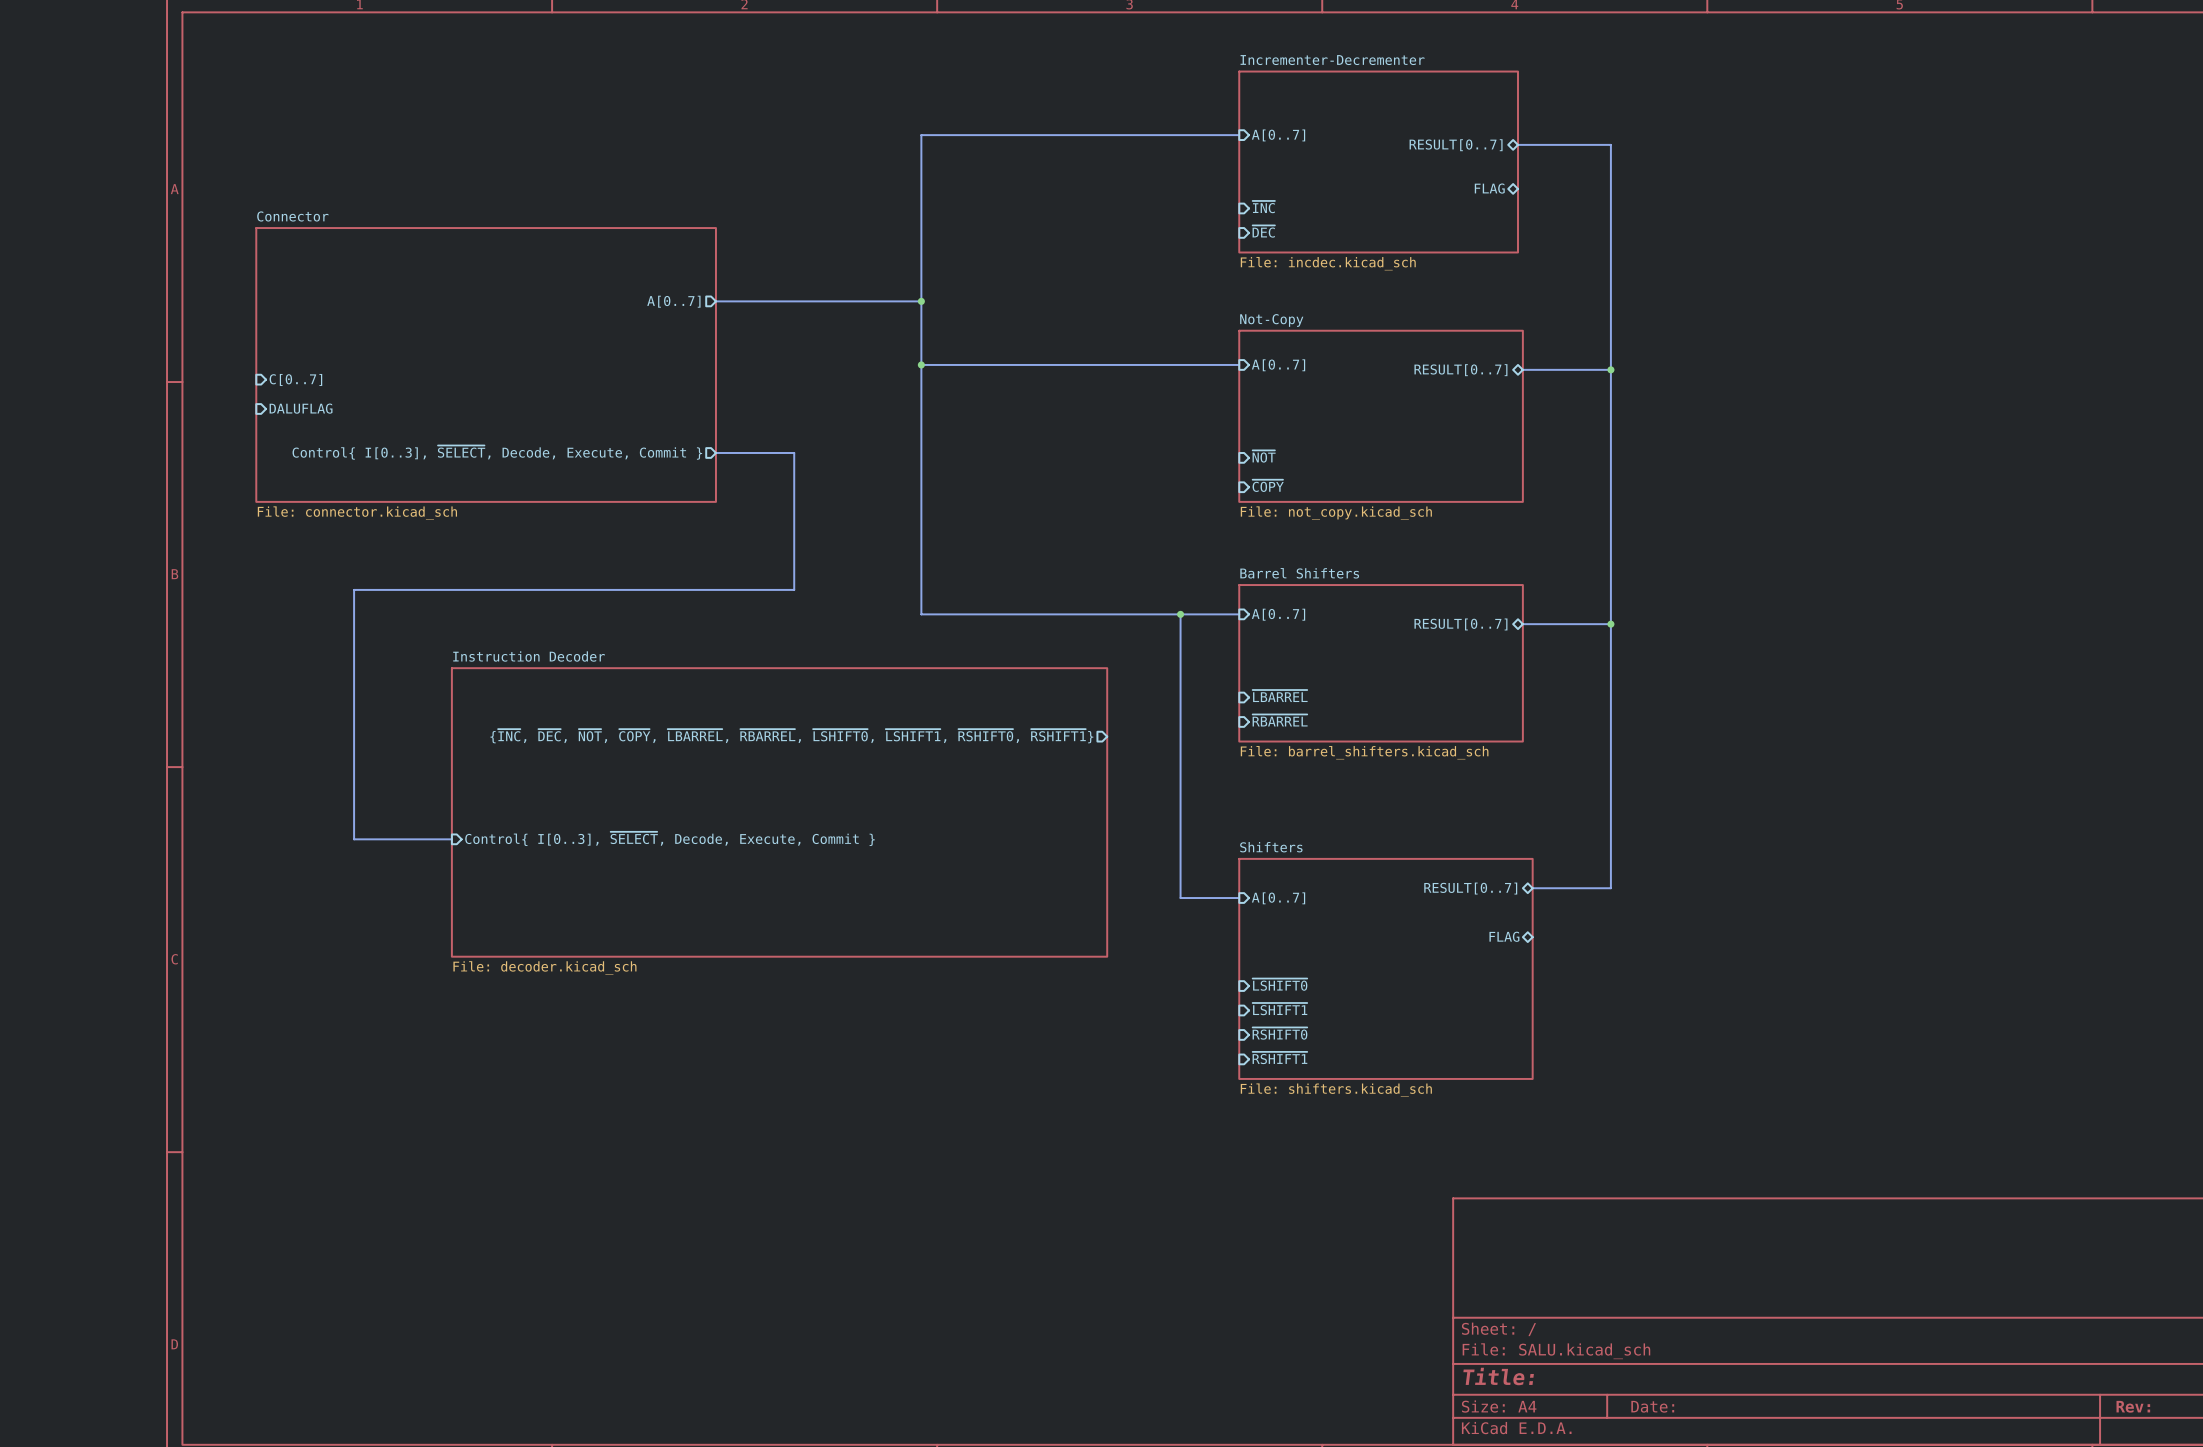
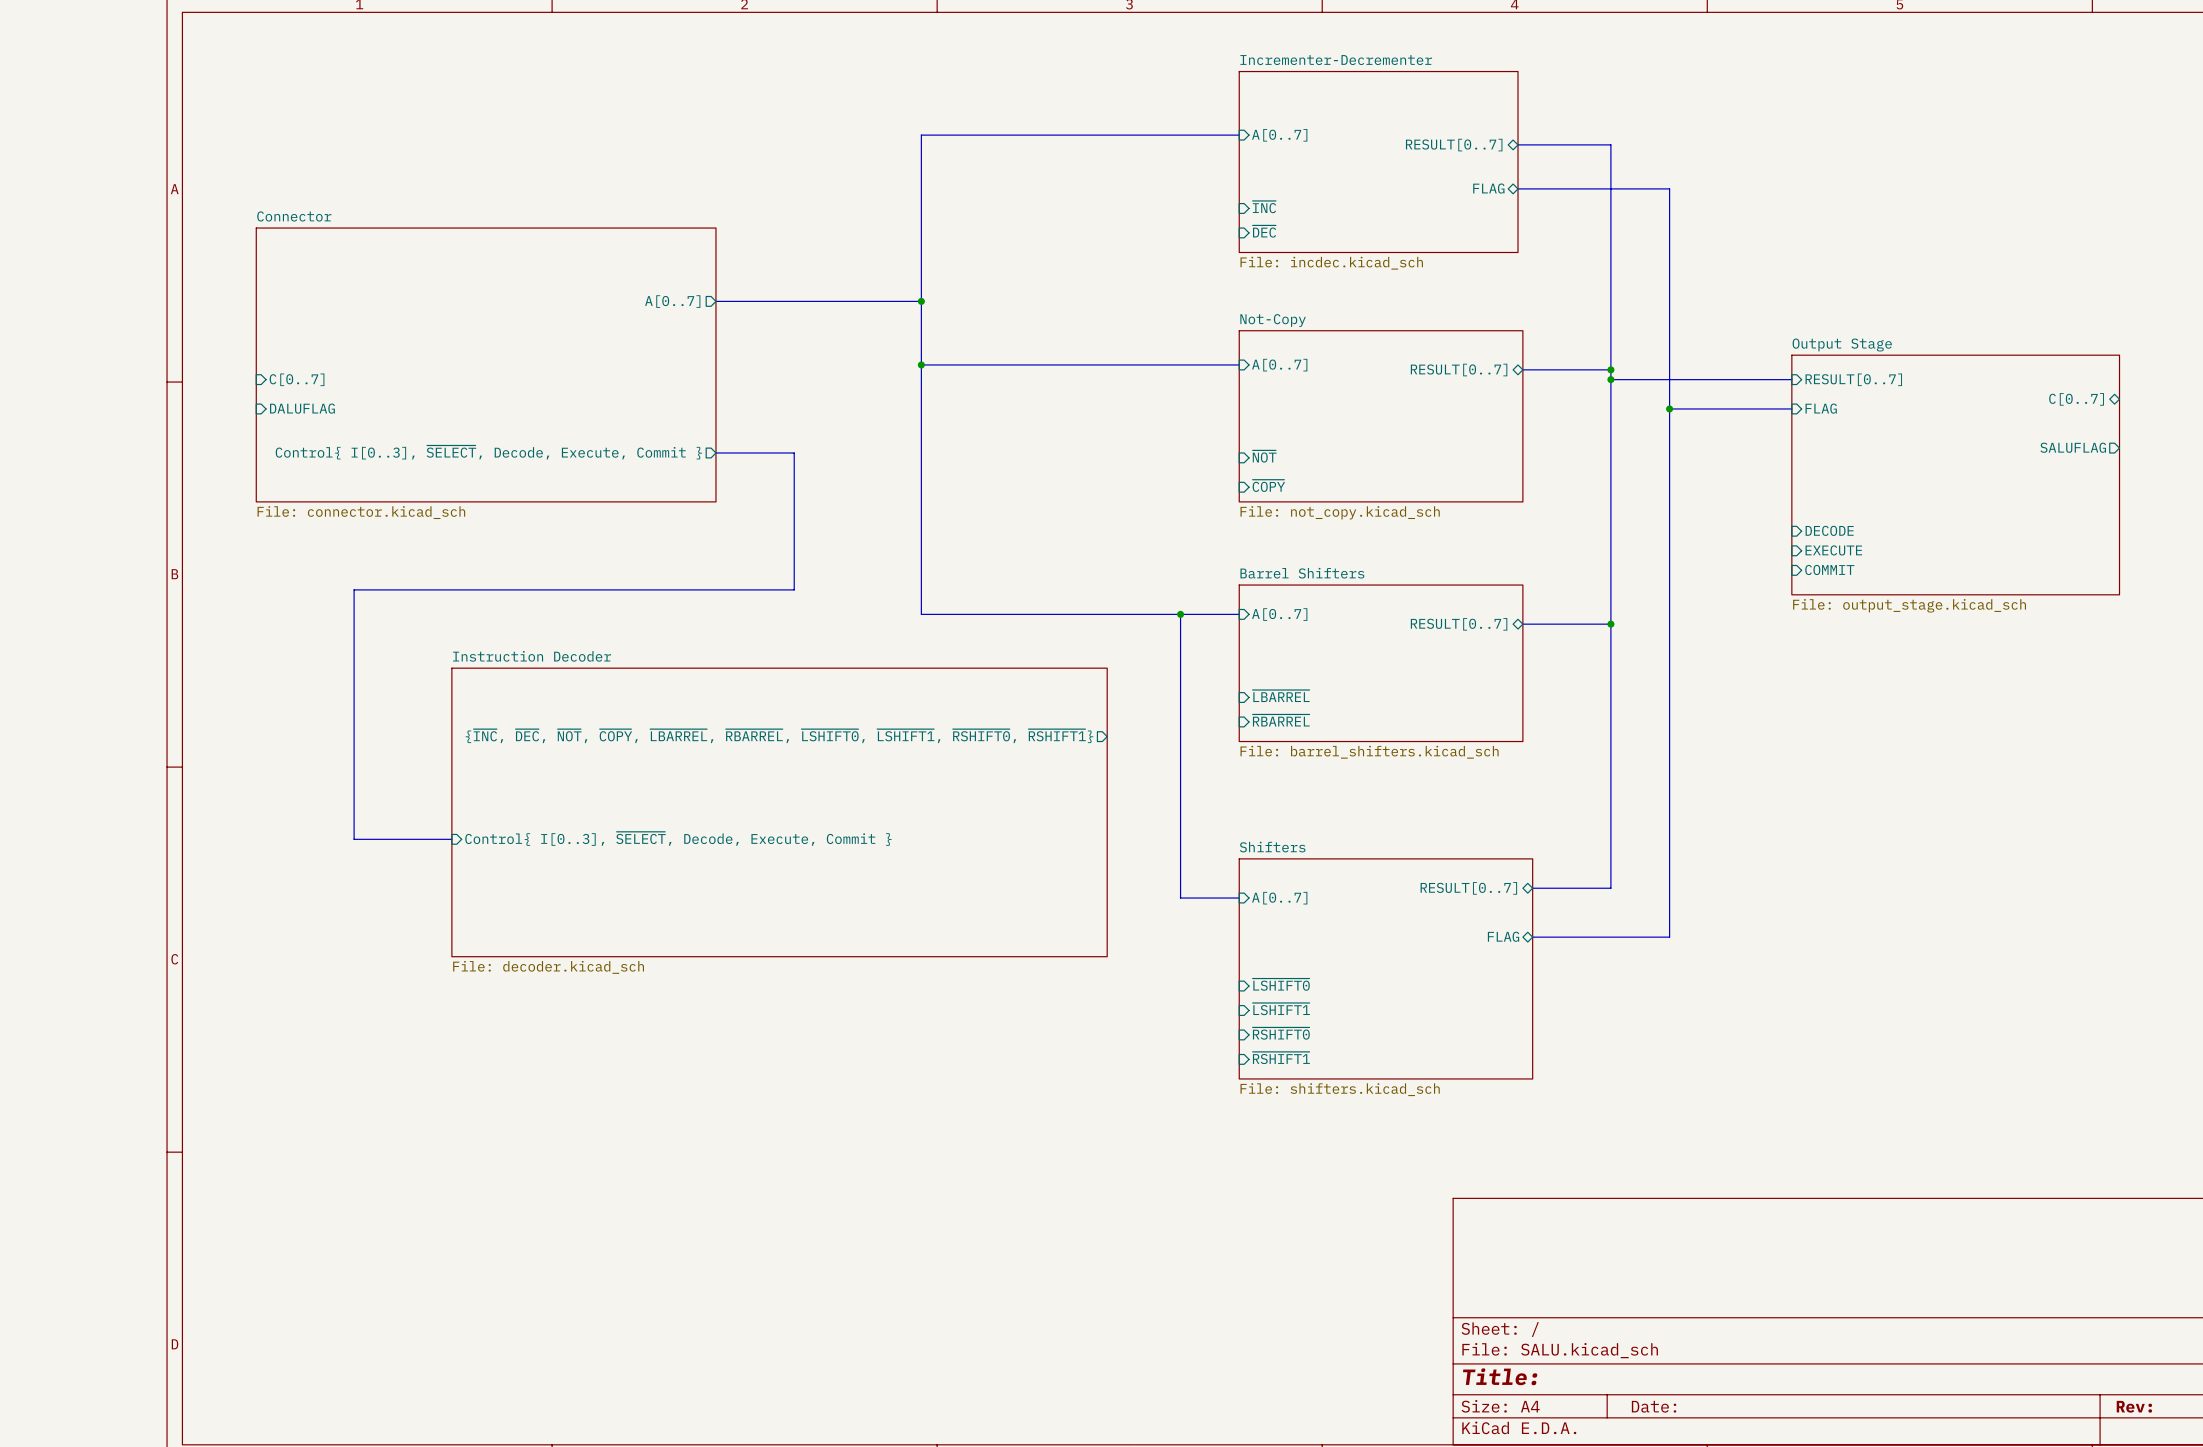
bus: none -> (1518, 188) (1669, 188) (1669, 937) (1532, 937)
bus: none -> (1610, 379) (1791, 379)
junction: none -> (1610, 379)
sheet pin: none -> RESULT[0..7] (1853, 379)
sheet pin: none -> C[0..7] (2076, 399)
bus: none -> (1669, 408) (1791, 408)
junction: none -> (1669, 408)
sheet pin: none -> FLAG (1821, 408)
sheet pin: none -> SALUFLAG (2073, 447)
sheet Output Stage: none -> File: output_stage.kicad_sch (1955, 475)
sheet pin: none -> DECODE (1829, 530)
sheet pin: none -> EXECUTE (1833, 550)
sheet pin: none -> COMMIT (1829, 569)

